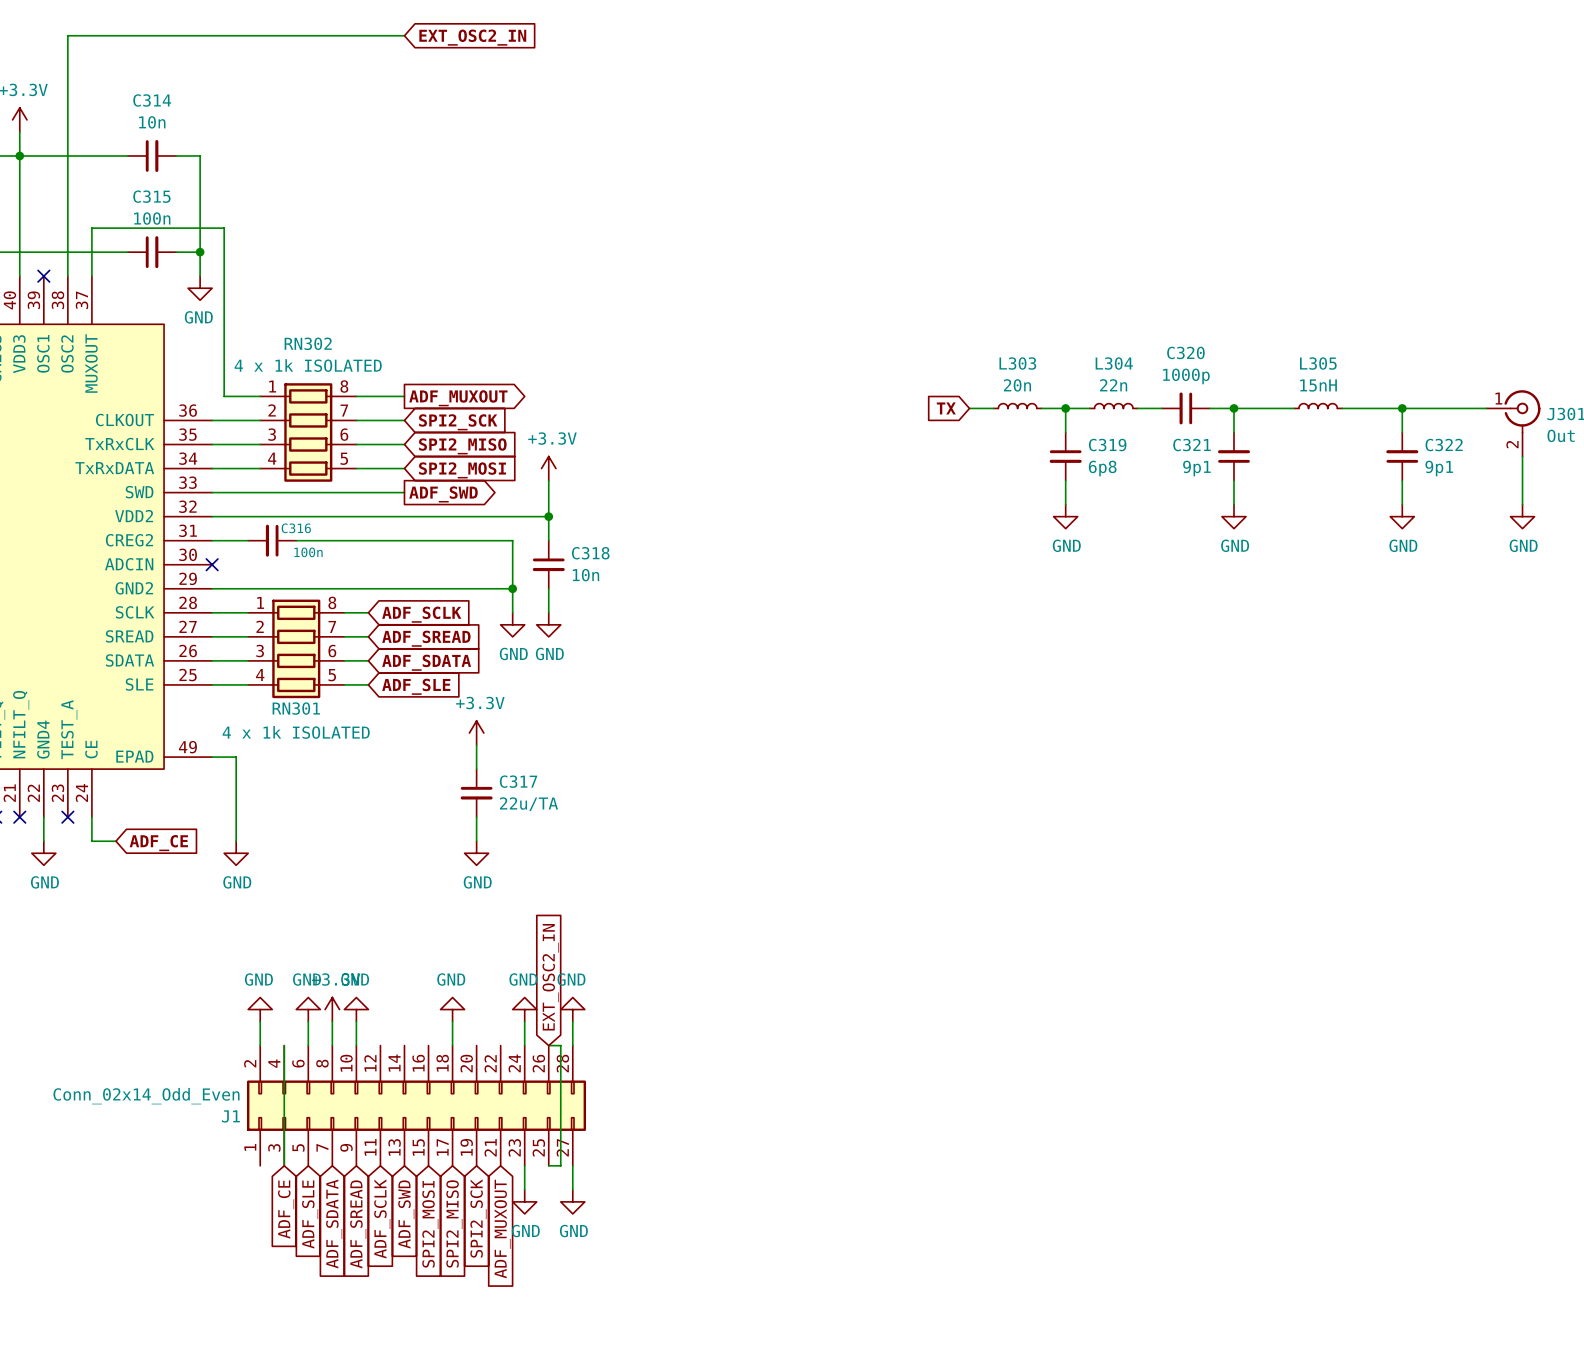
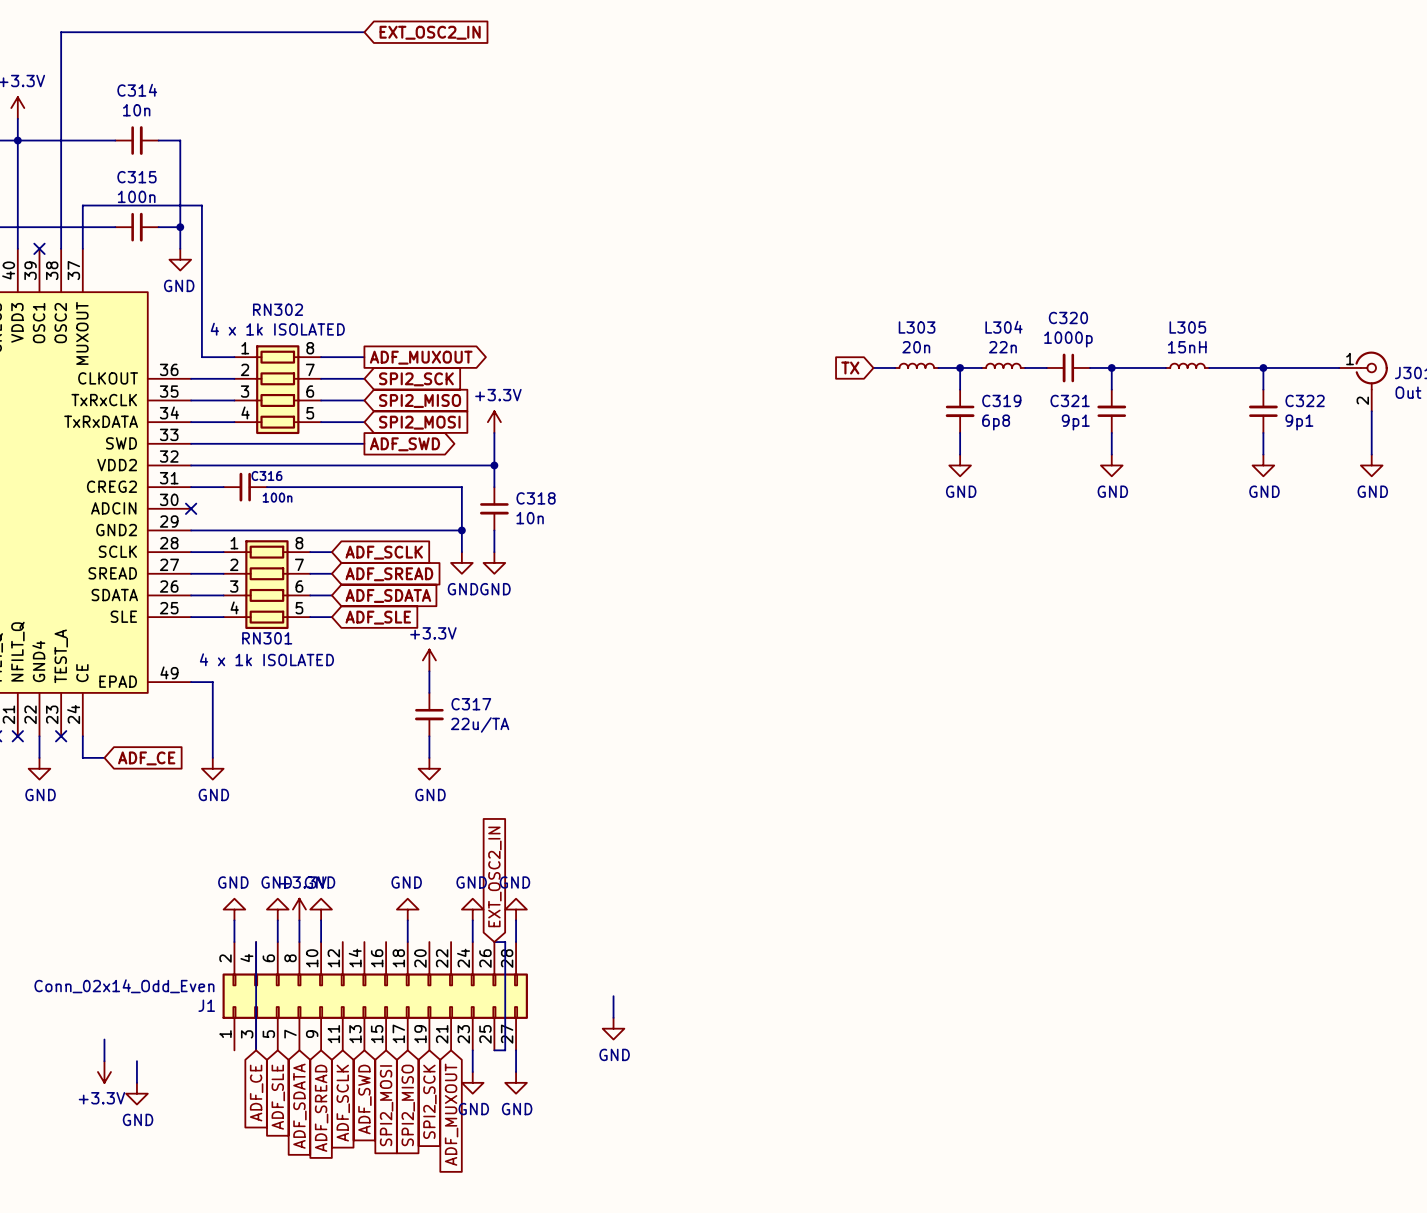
wire: none -> (613, 996) (613, 1017)
power symbol: none -> GND (613, 1028)
wire: none -> (104, 1039) (104, 1061)
wire: none -> (136, 1061) (136, 1082)
power symbol: none -> +3.3V (104, 1072)
power symbol: none -> GND (136, 1093)

